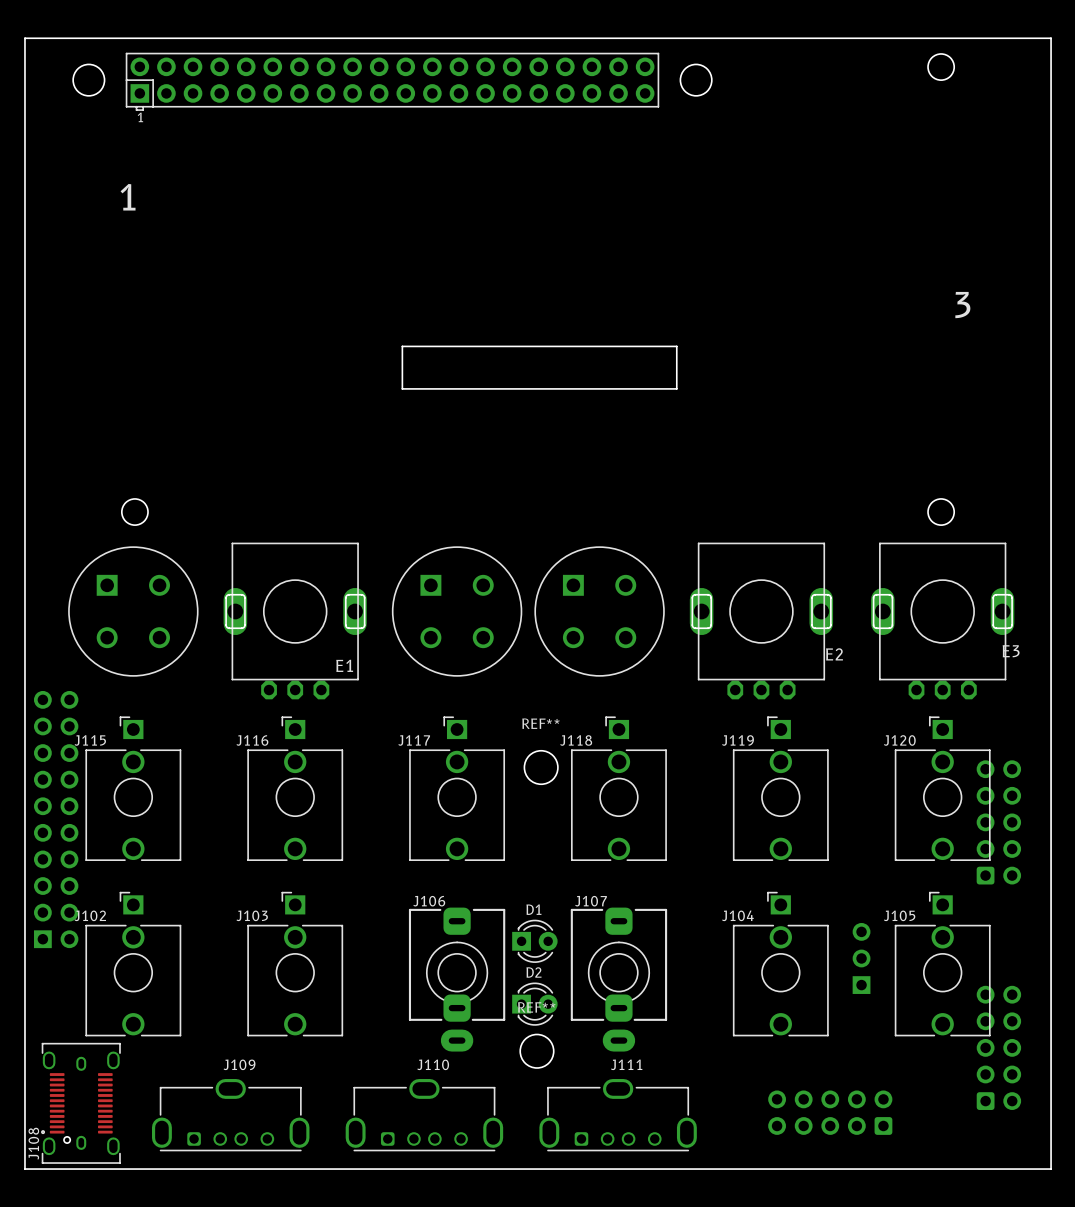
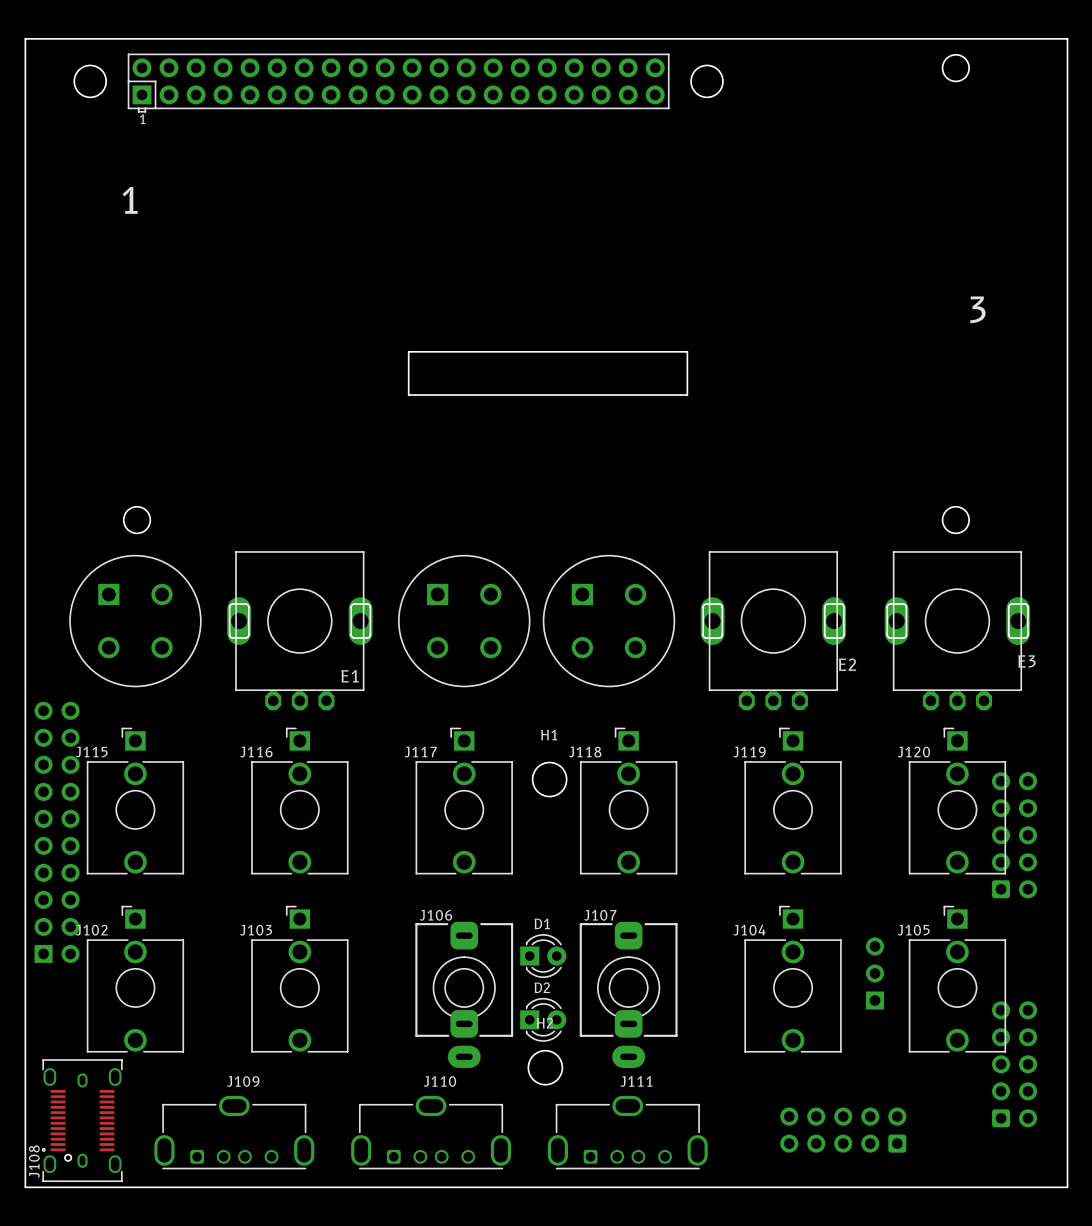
REF** name: REF** (540, 723) -> H1 (549, 734)
REF** name: REF** (536, 1007) -> H2 (545, 1023)

